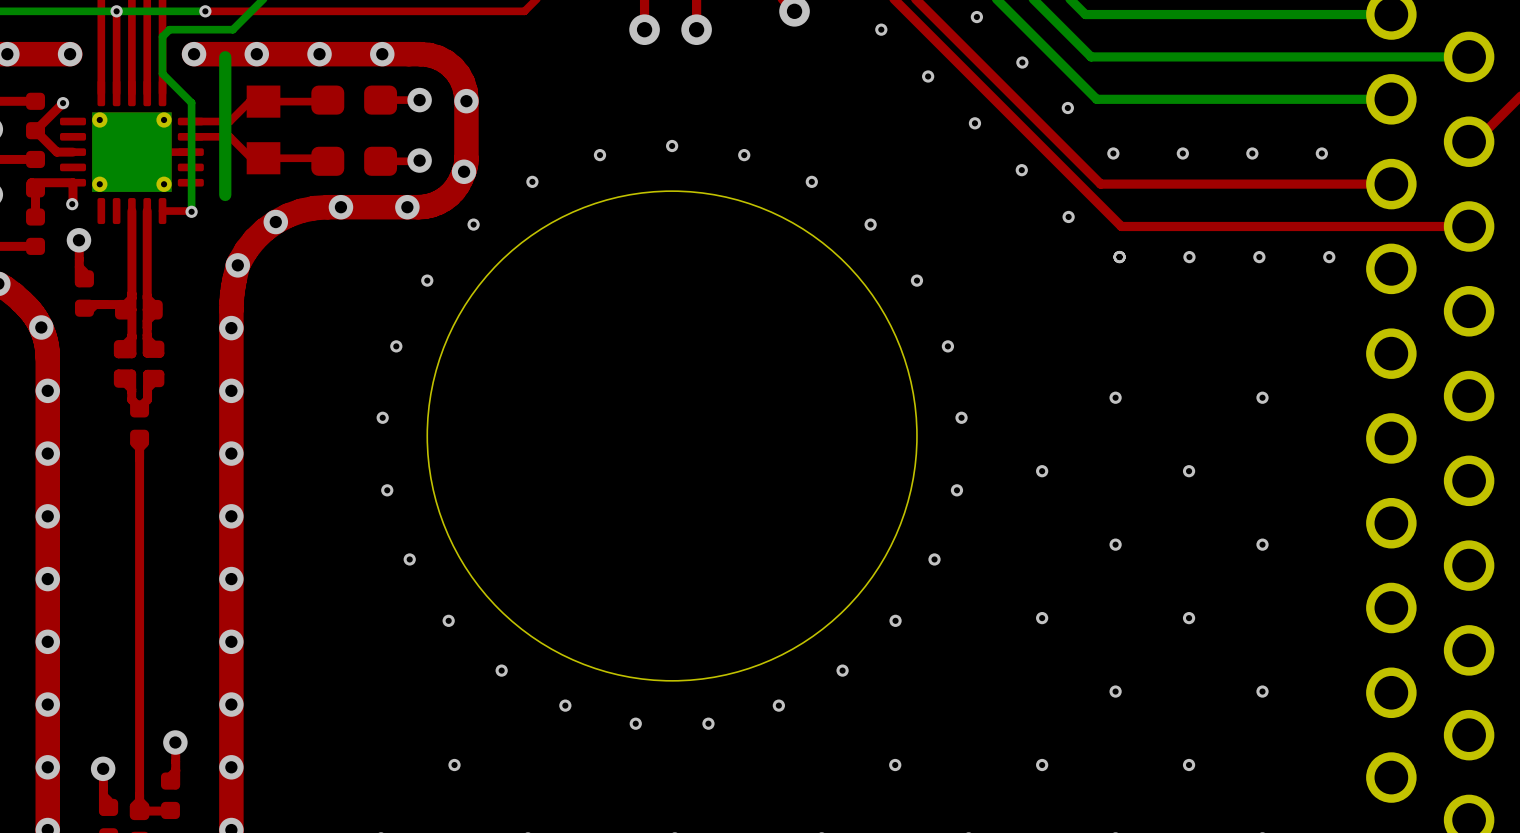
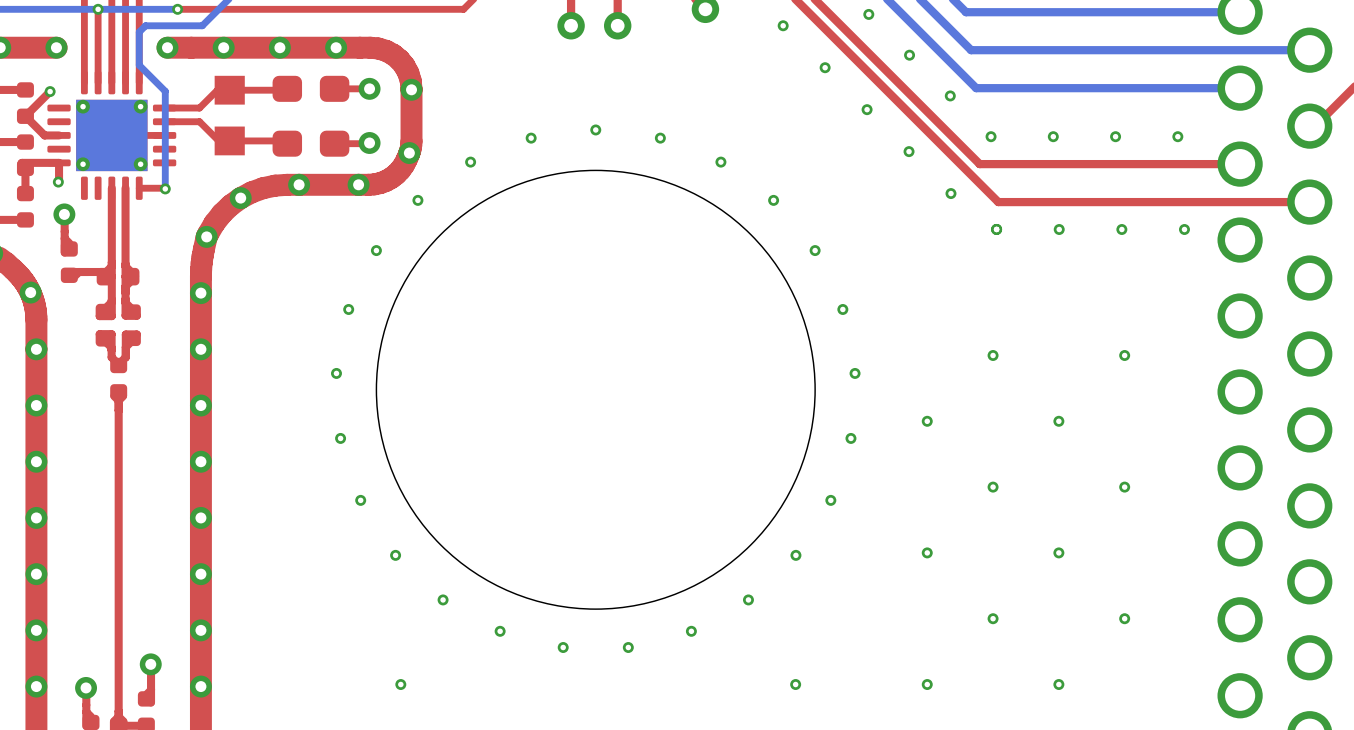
bottom track: (225, 57) (225, 194) -> none

